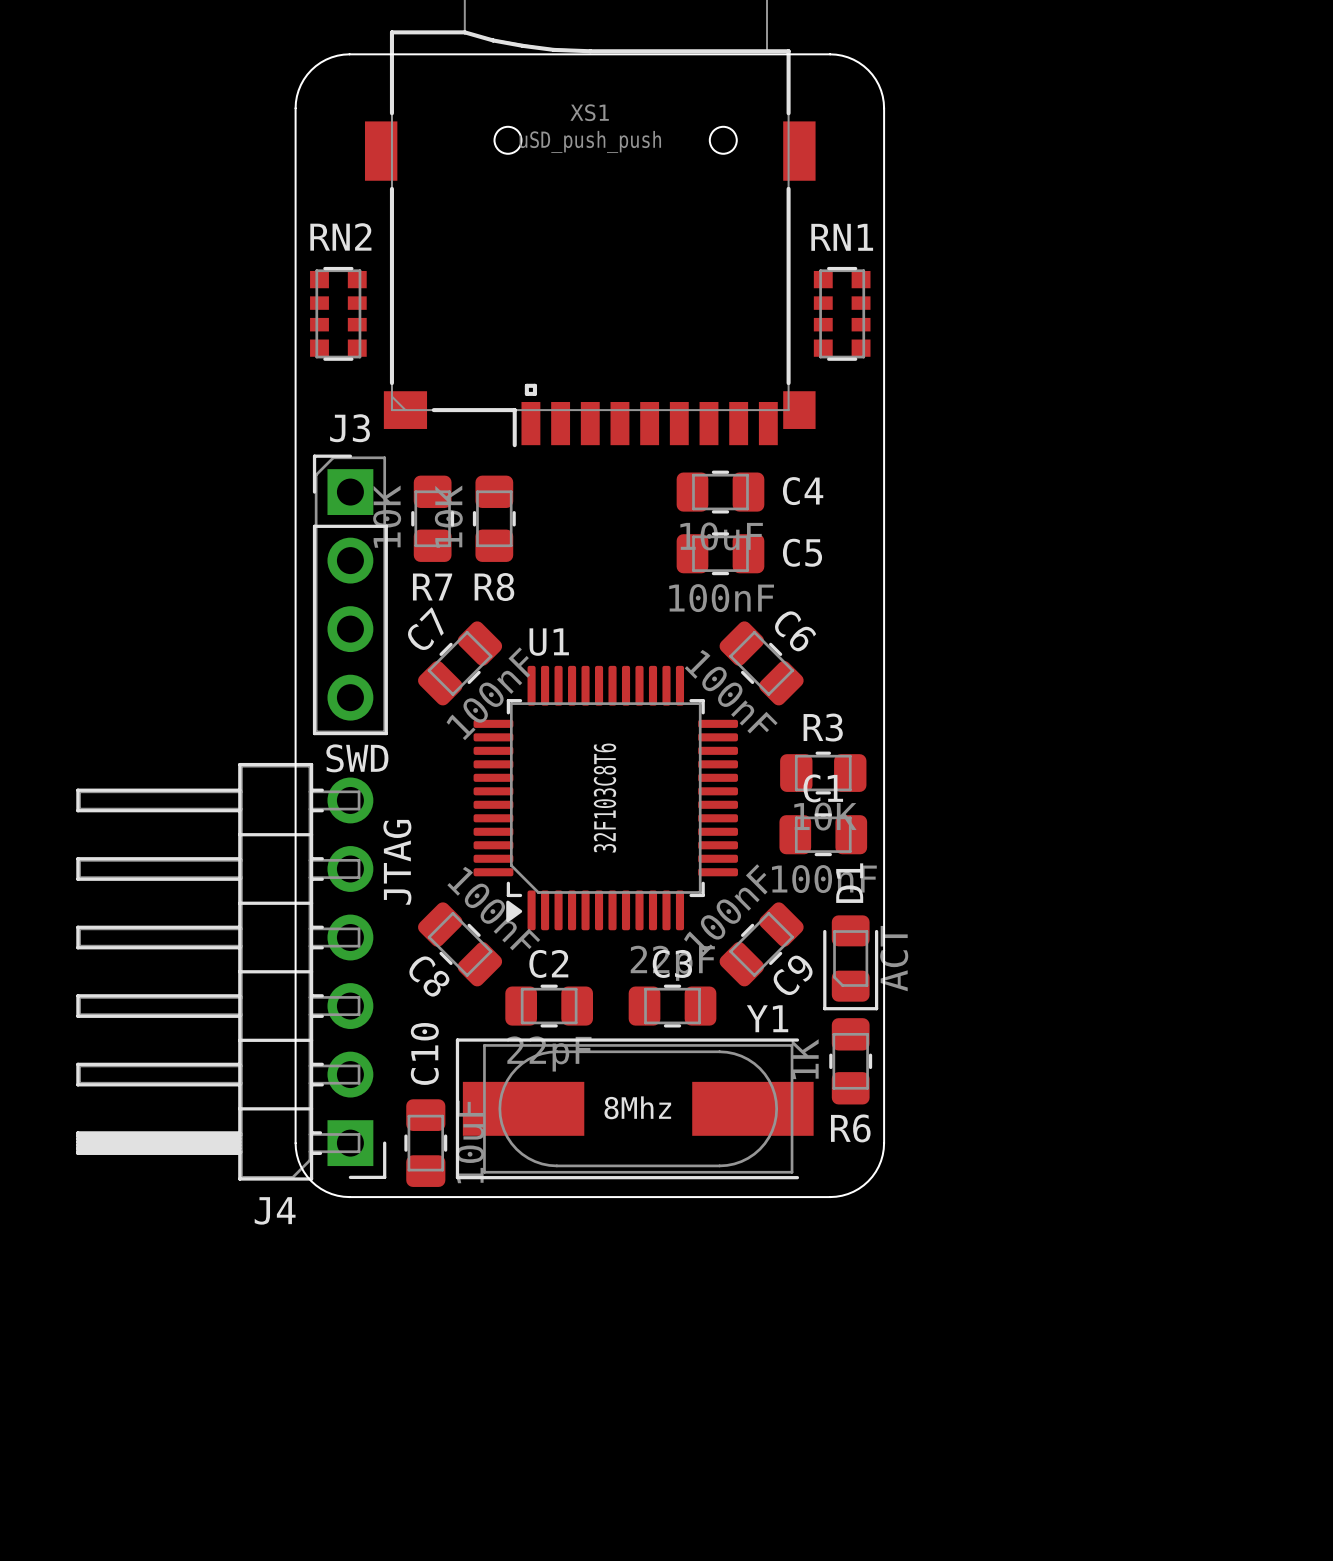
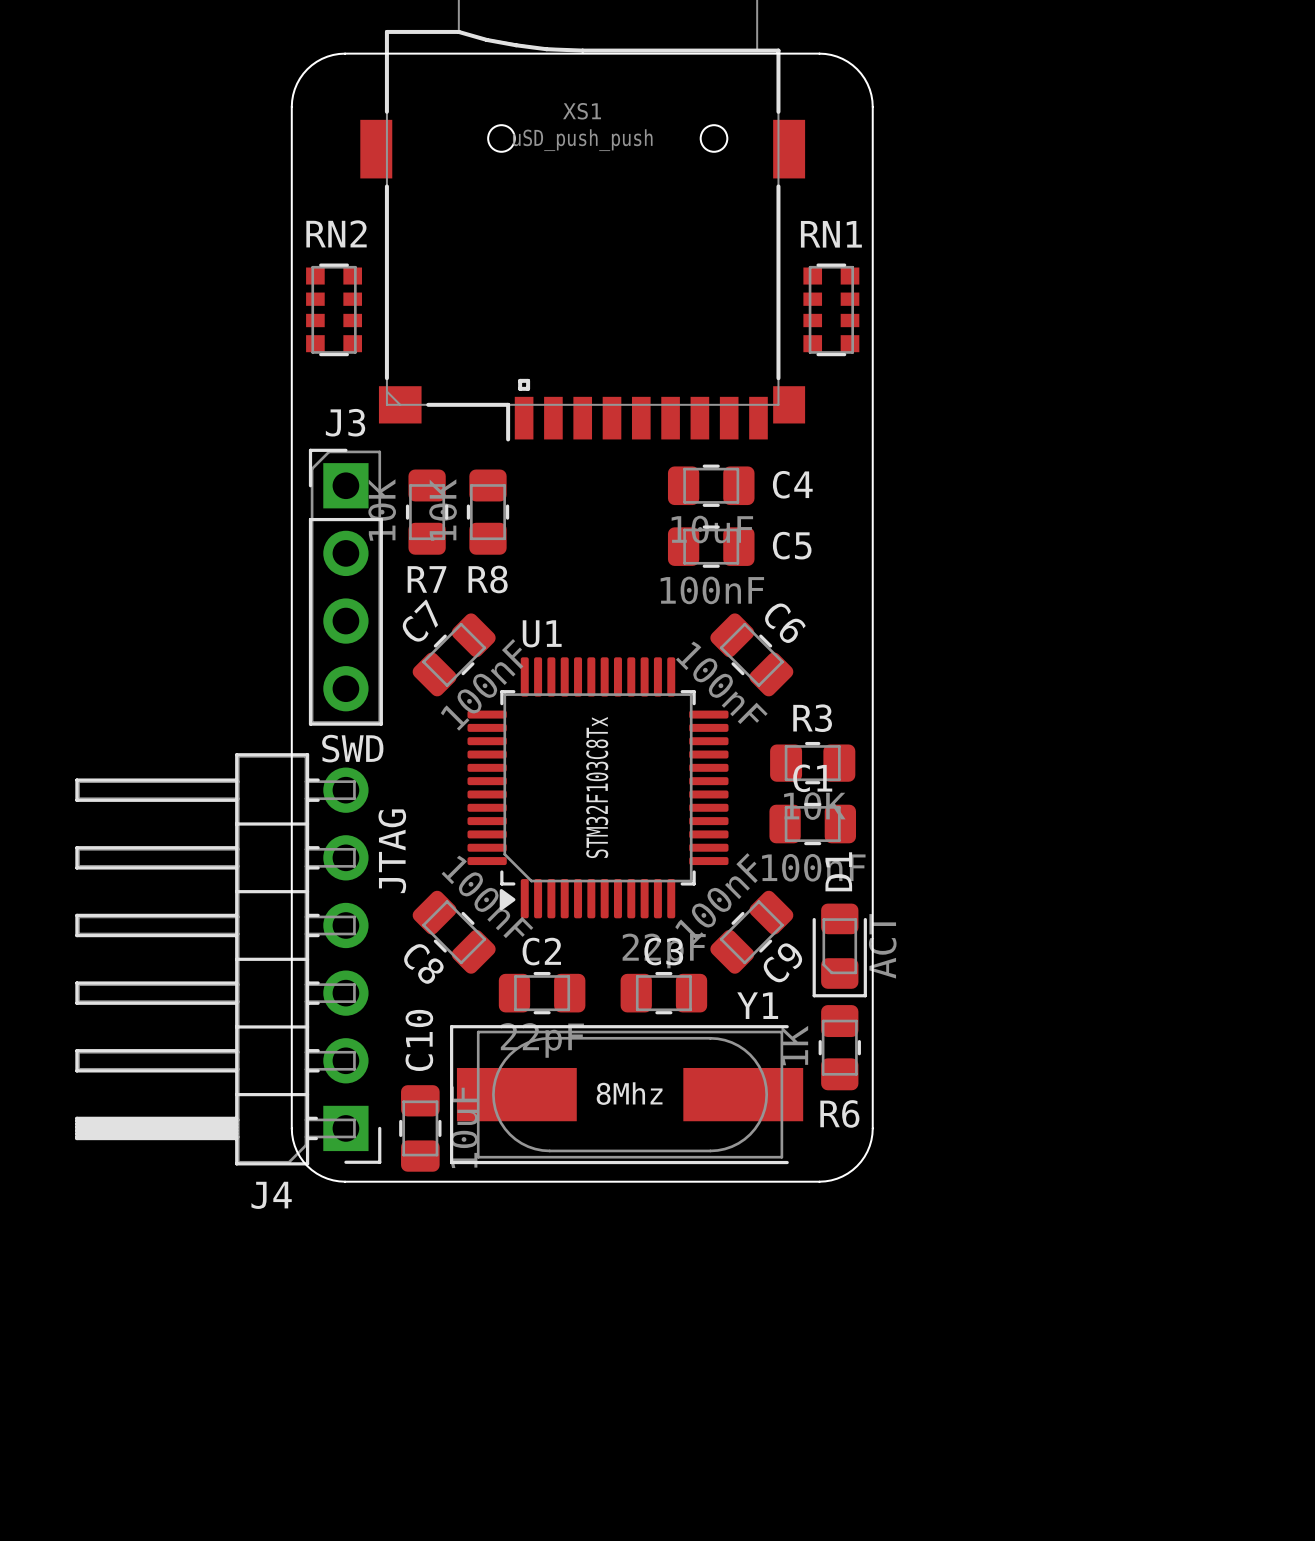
U1 value: 32F103C8T6 (604, 798) -> STM32F103C8Tx (597, 787)

